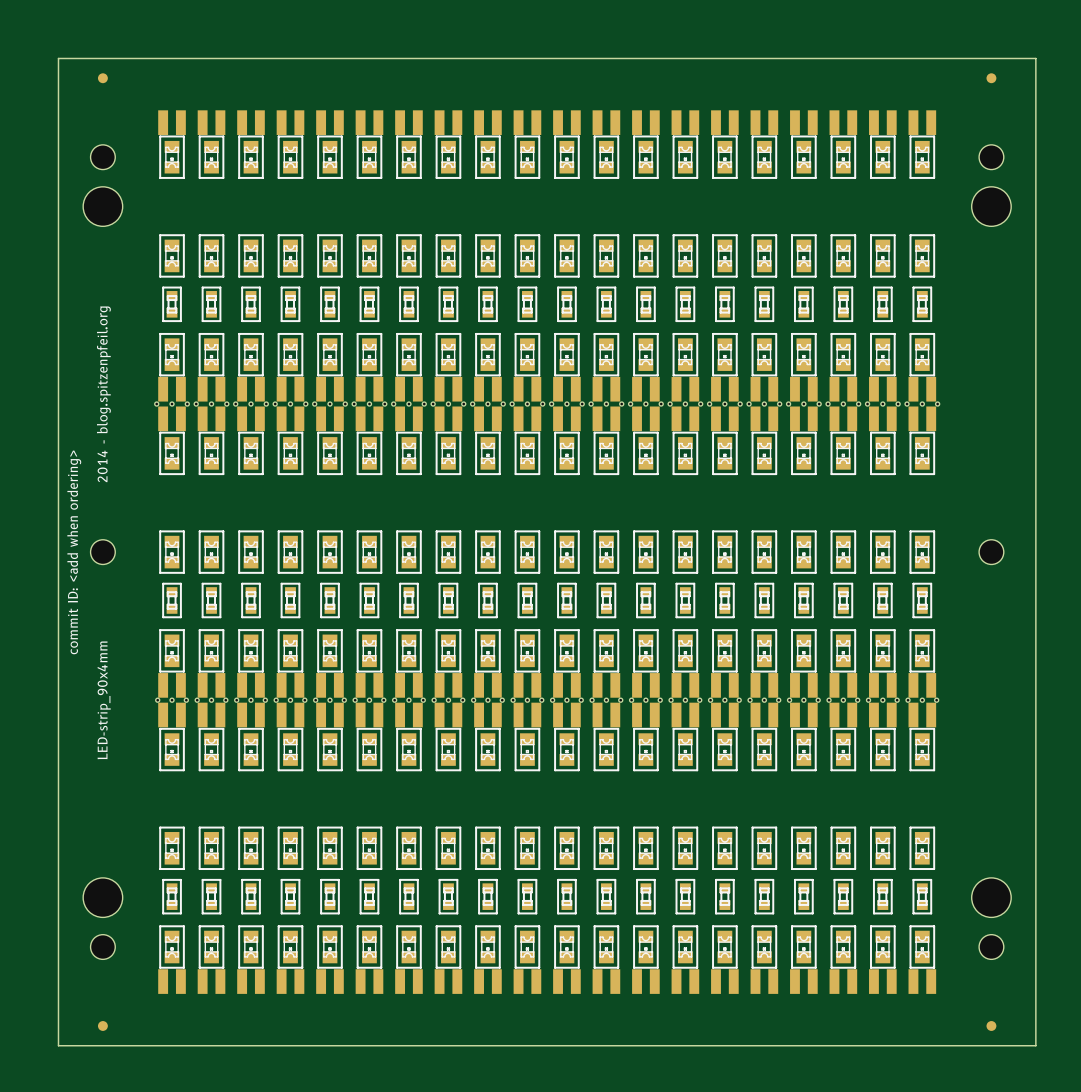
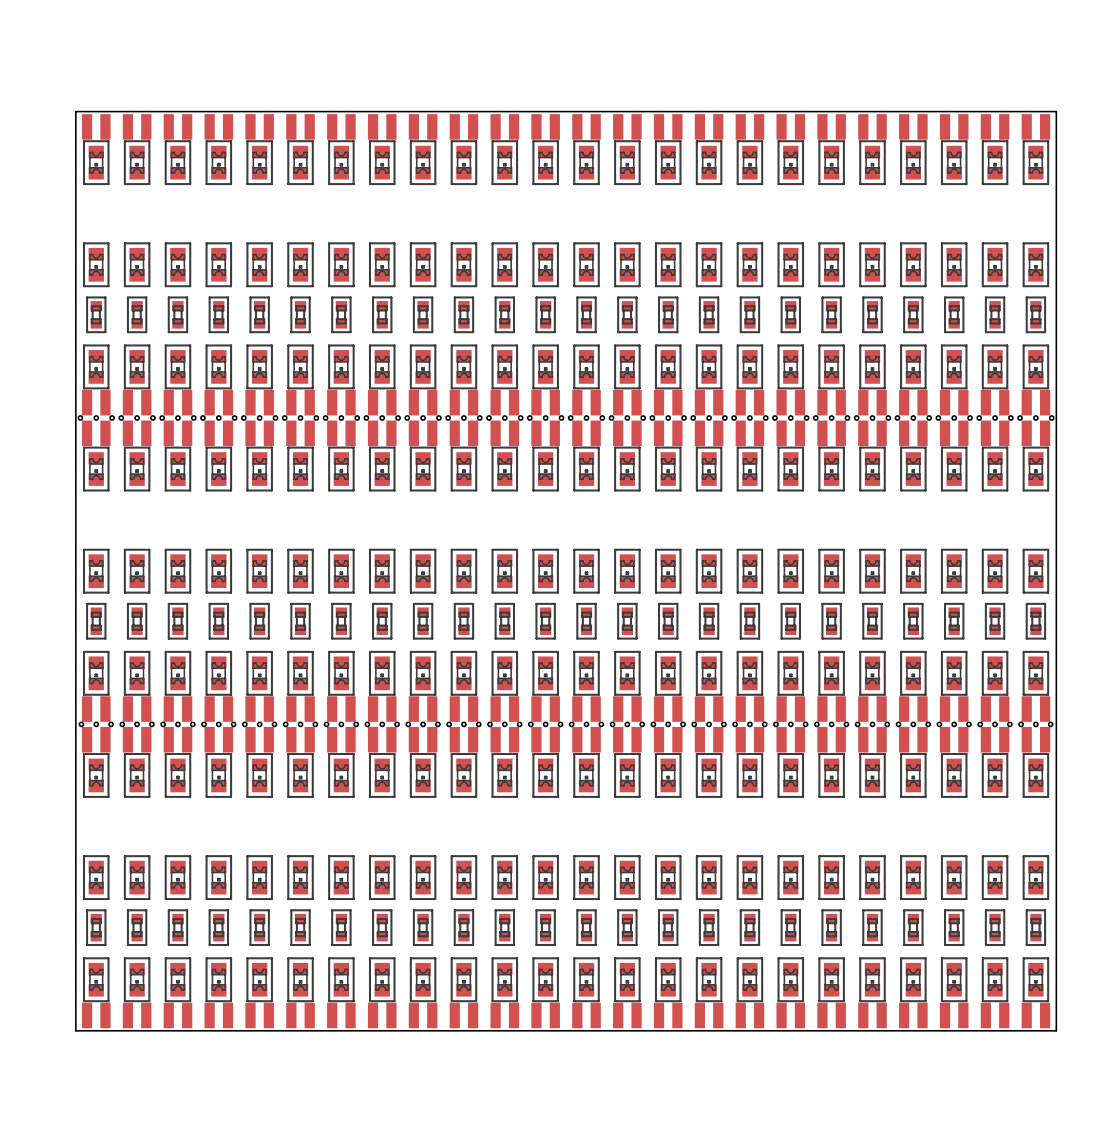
board edge: (58, 58) (1035, 58) (1035, 1045) (58, 1045) (58, 58) -> (75, 111) (75, 1030) (1056, 1030) (1056, 111) (75, 111)
part: (102, 78) -> none
part: (991, 78) -> none
part: none -> (96, 126)
part: none -> (137, 126)
part: none -> (995, 126)
part: none -> (1035, 126)
part footprint: [90, 144, 116, 170] -> [82, 140, 110, 186]
part footprint: [979, 144, 1004, 170] -> [1022, 140, 1050, 186]
part: none -> (137, 162)
part: none -> (995, 162)
part: (102, 206) -> none
part: (991, 206) -> none
part: none -> (96, 264)
part: none -> (137, 264)
part: none -> (995, 264)
part: none -> (1035, 264)
part: none -> (96, 314)
part: none -> (137, 314)
part: none -> (995, 314)
part: none -> (1035, 314)
part: none -> (96, 366)
part: none -> (137, 366)
part: none -> (995, 366)
part: none -> (1035, 366)
part: none -> (96, 402)
part: none -> (137, 402)
part: none -> (995, 402)
part: none -> (1035, 402)
text: 2014 - blog.spitzenpfeil.org (103, 394) -> none
part: none -> (96, 431)
part: none -> (137, 431)
part: none -> (995, 431)
part: none -> (1035, 431)
part: none -> (96, 469)
part: none -> (137, 469)
part: none -> (995, 469)
part: none -> (1035, 469)
part footprint: [90, 539, 116, 565] -> [82, 548, 110, 594]
part footprint: [979, 539, 1004, 565] -> [1022, 548, 1050, 594]
text: commit ID: <add when ordering> (74, 552) -> none
part: none -> (137, 571)
part: none -> (995, 571)
part: none -> (96, 621)
part: none -> (137, 621)
part: none -> (995, 621)
part: none -> (1035, 621)
part: none -> (96, 673)
part: none -> (137, 673)
part: none -> (995, 673)
part: none -> (1035, 673)
part: none -> (96, 709)
part: none -> (137, 709)
part: none -> (995, 709)
part: none -> (1035, 709)
text: LED-strip_90x4mm (104, 700) -> none
part: none -> (96, 737)
part: none -> (137, 737)
part: none -> (995, 737)
part: none -> (1035, 737)
part: none -> (96, 775)
part: none -> (137, 775)
part: none -> (995, 775)
part: none -> (1035, 775)
part: none -> (96, 877)
part: none -> (137, 877)
part: none -> (995, 877)
part: none -> (1035, 877)
part: none -> (96, 927)
part: none -> (137, 927)
part: none -> (995, 927)
part: none -> (1035, 927)
part: (102, 897) -> none
part: (991, 897) -> none
part footprint: [90, 934, 116, 960] -> [82, 957, 110, 1003]
part footprint: [979, 934, 1004, 960] -> [1022, 957, 1050, 1003]
part: none -> (137, 979)
part: none -> (995, 979)
part: none -> (96, 1015)
part: none -> (137, 1015)
part: none -> (995, 1015)
part: none -> (1035, 1015)
part: (102, 1025) -> none
part: (991, 1025) -> none

